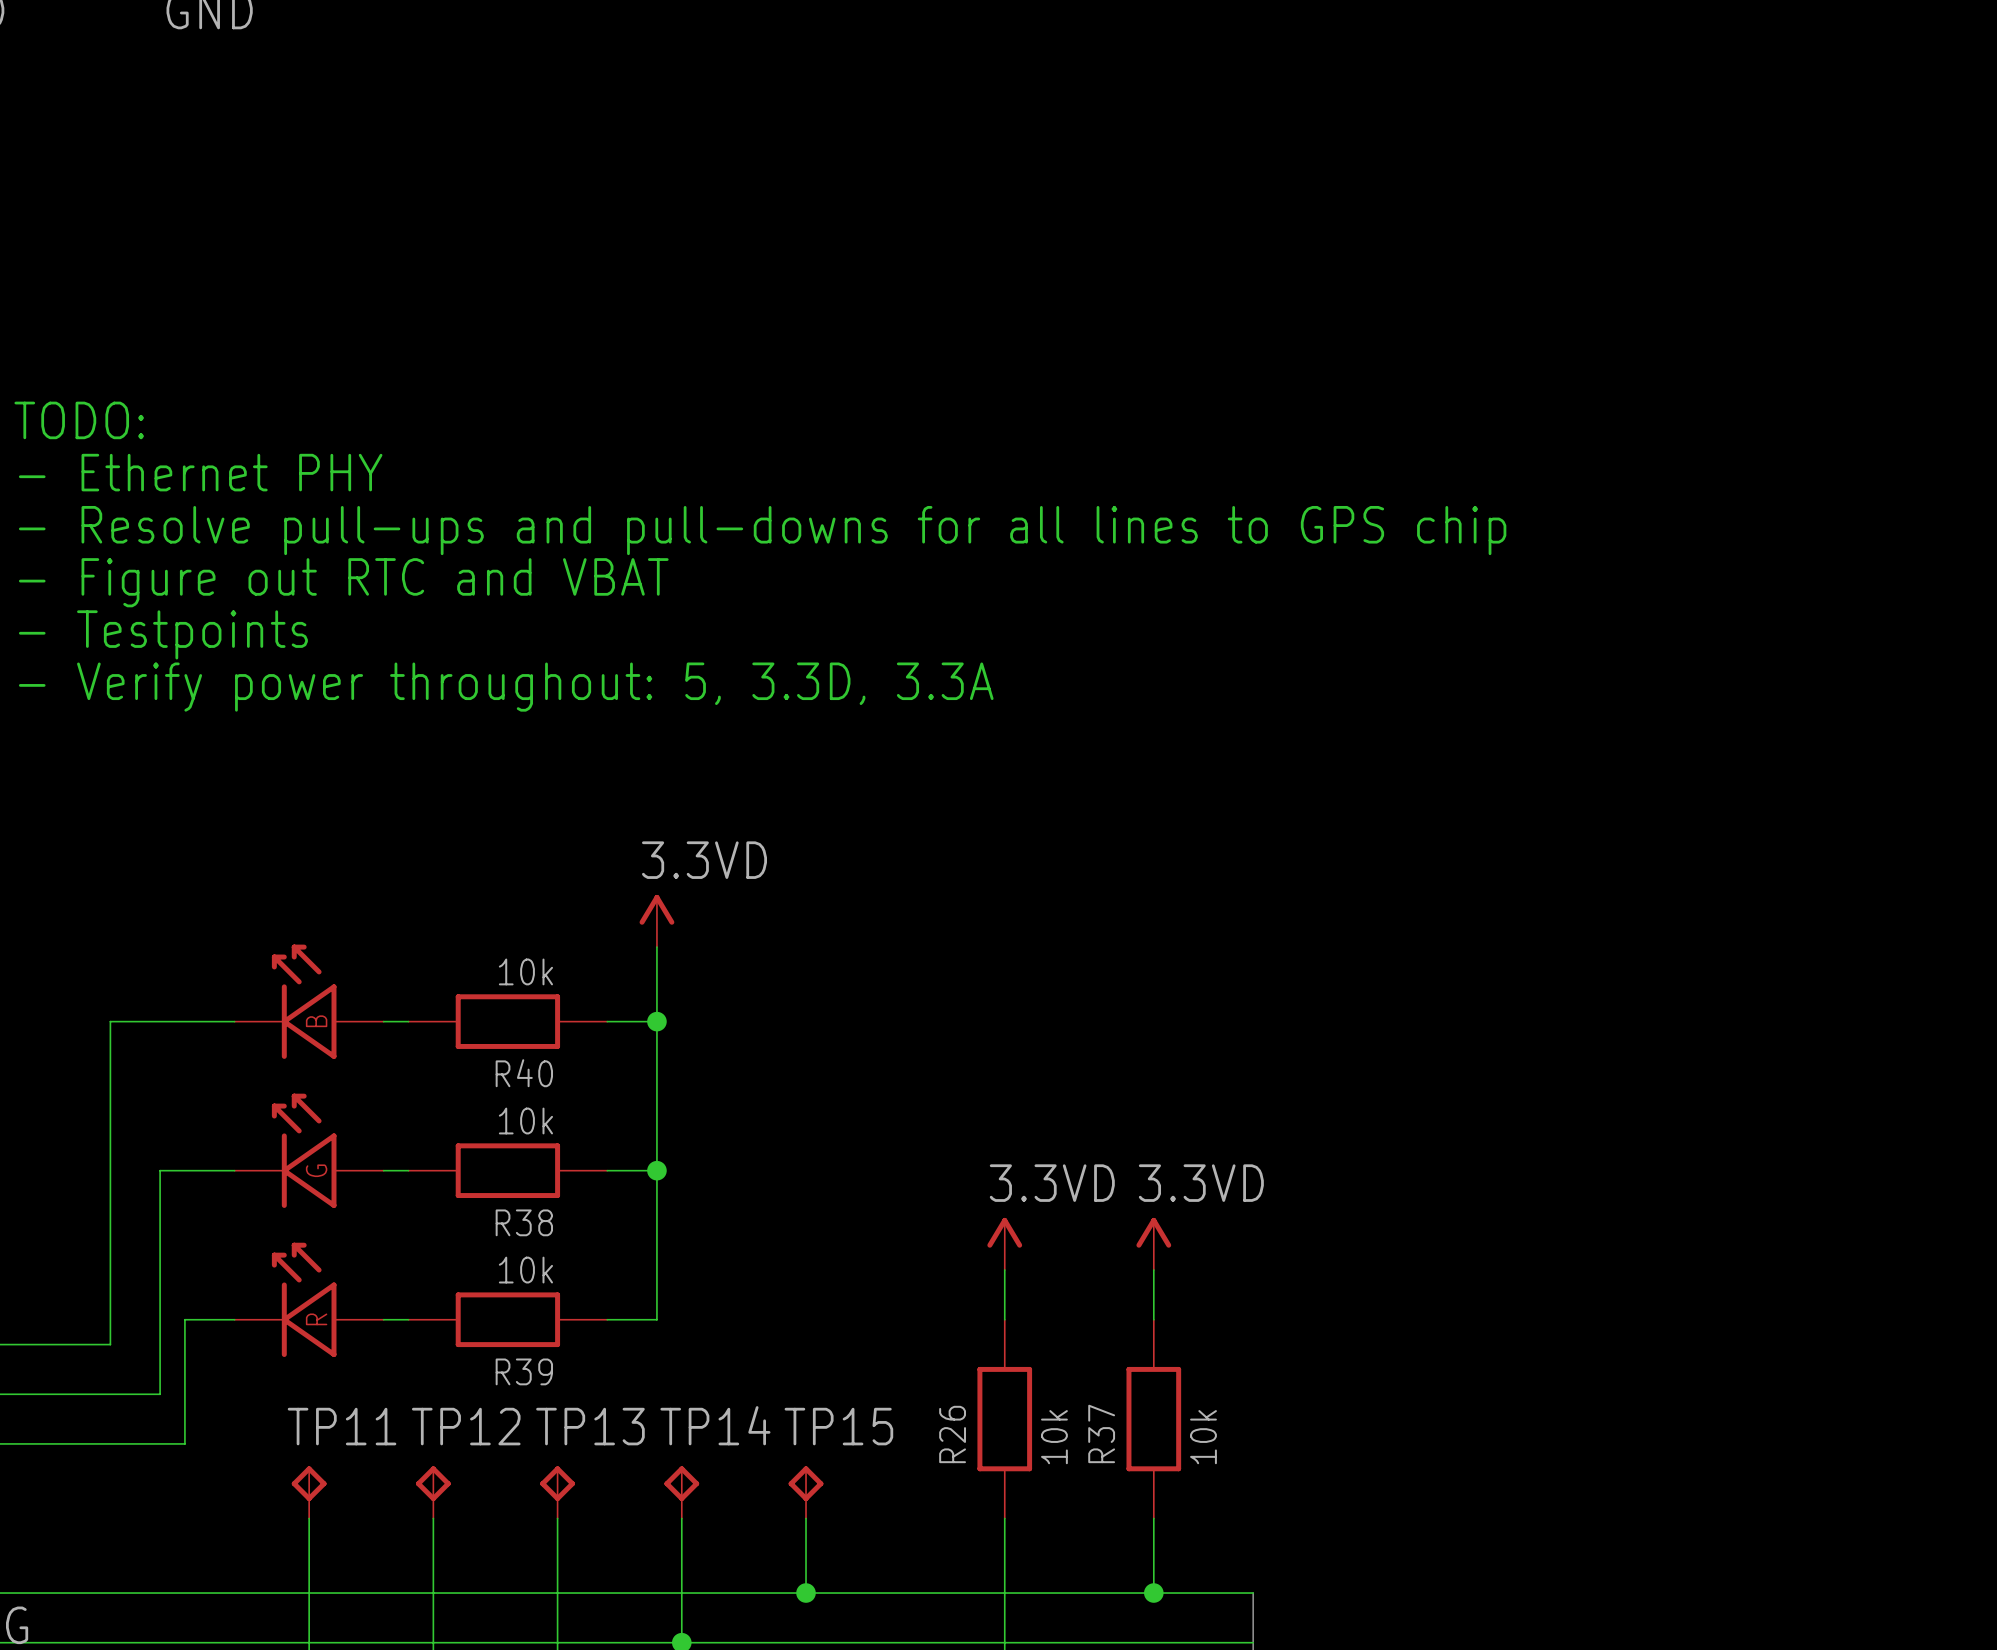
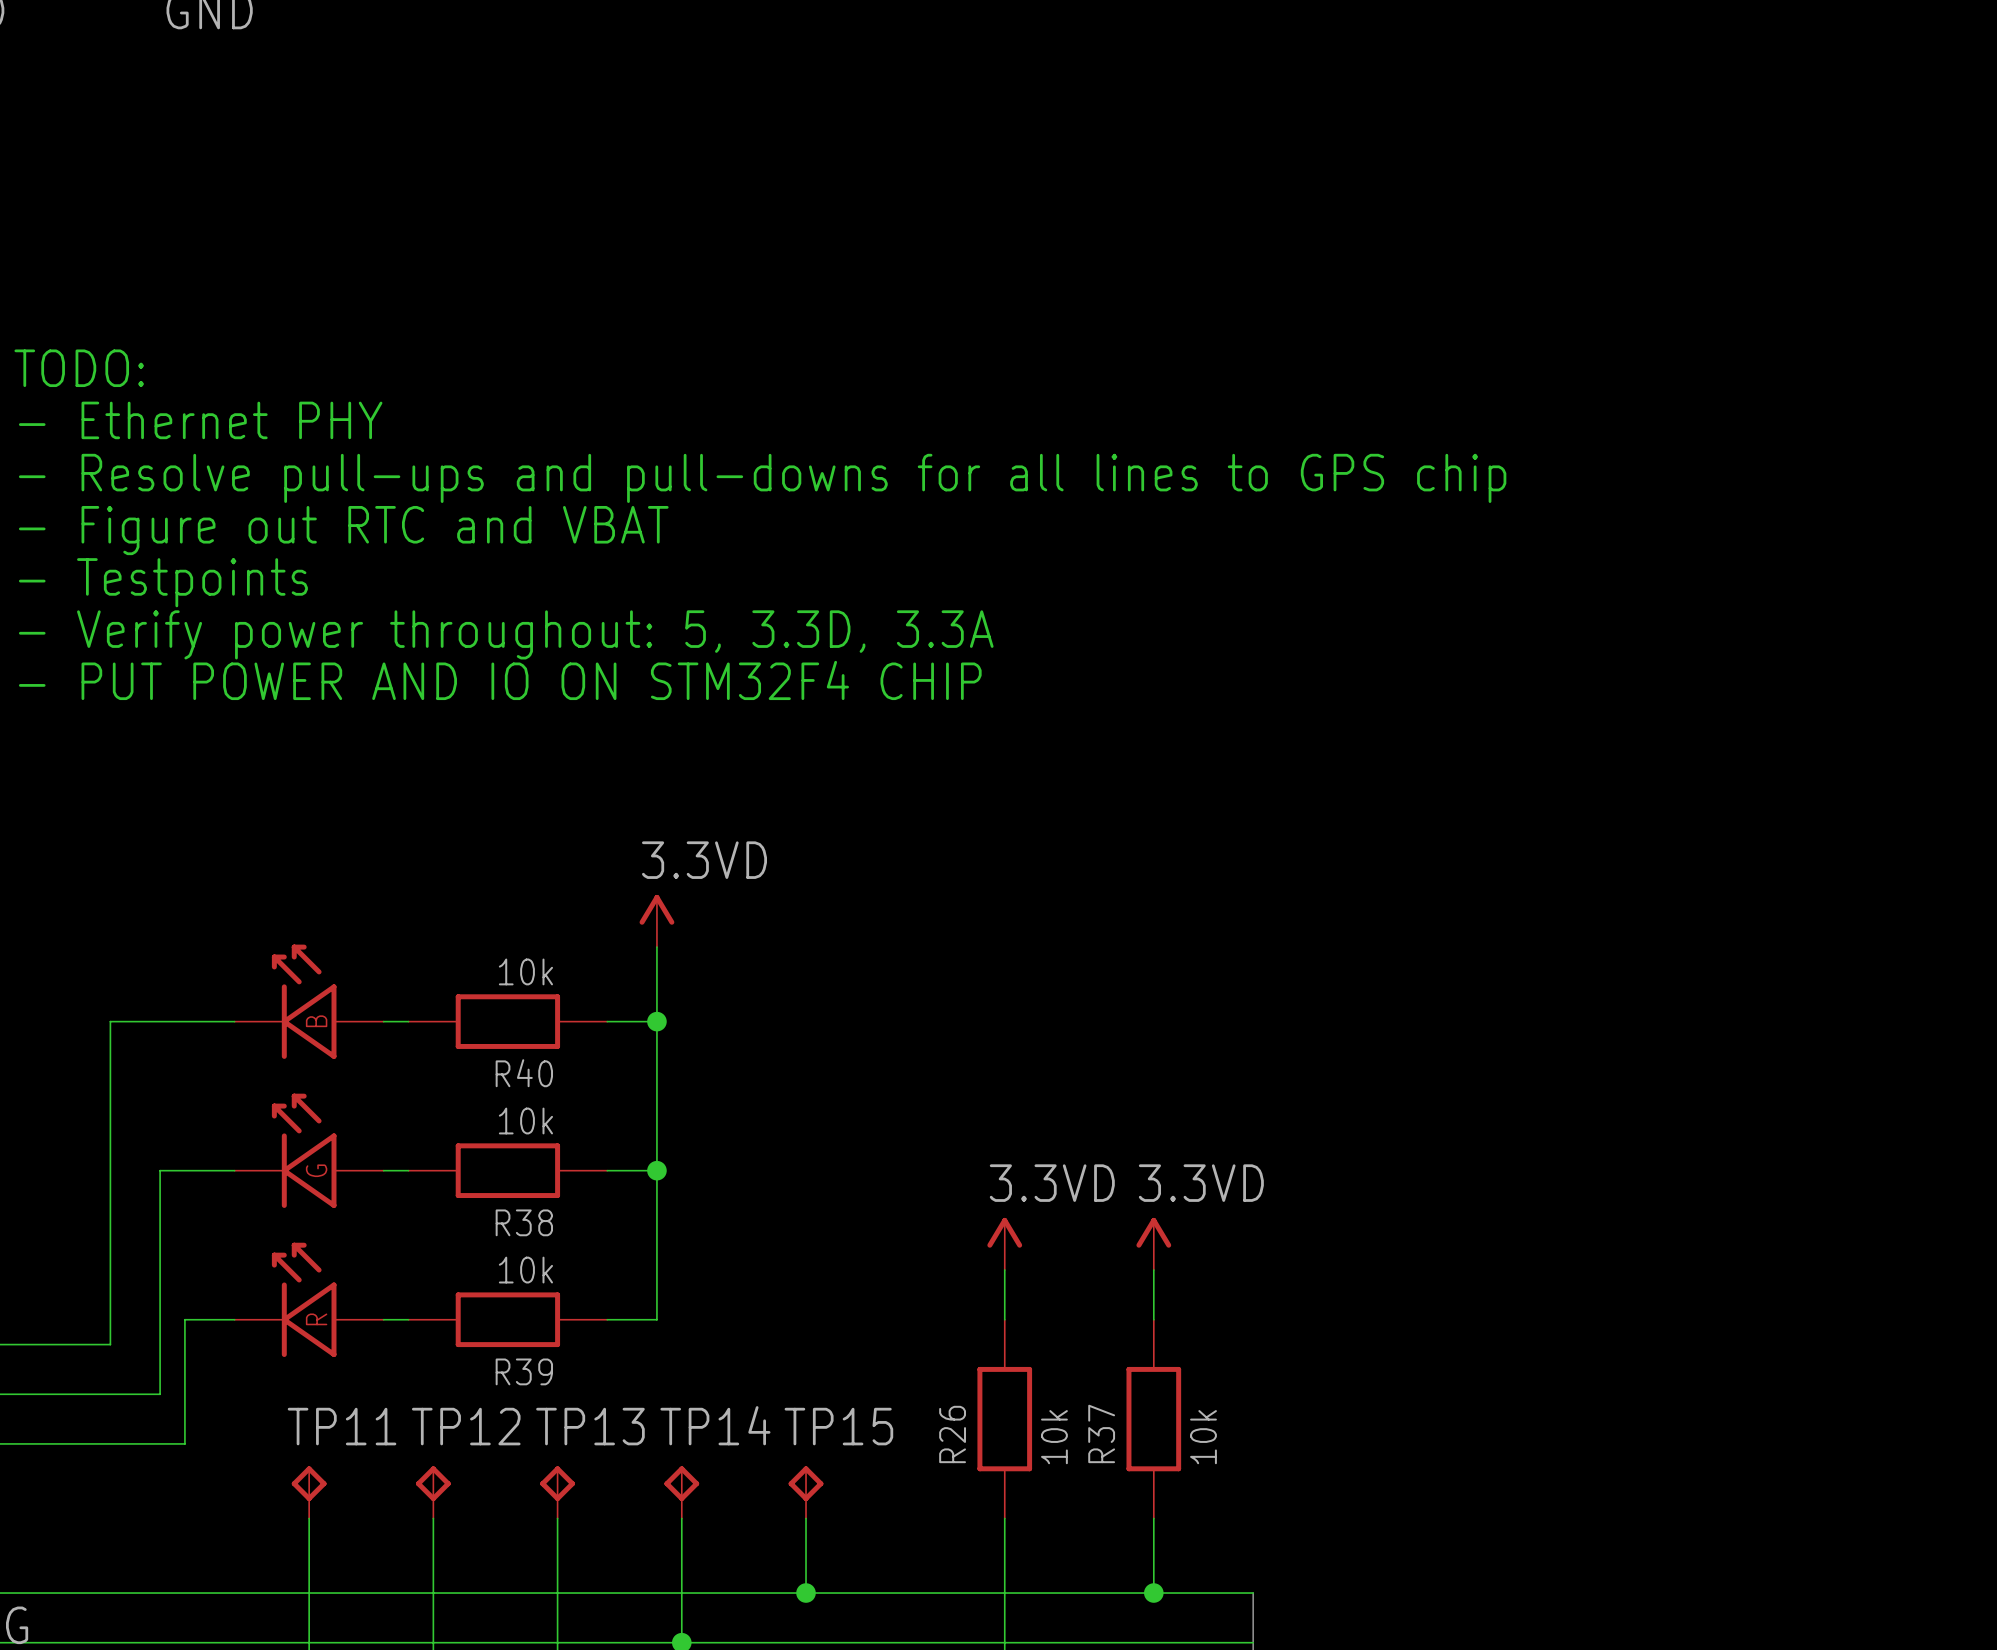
text: none -> TODO: (79, 368)
text: TODO: (79, 420) -> - Ethernet PHY (200, 420)
text: - Ethernet PHY (200, 472) -> - Resolve pull-ups and pull-downs for all lines to GPS chip (762, 478)
text: - Resolve pull-ups and pull-downs for all lines to GPS chip (762, 530) -> - Figure out RTC and VBAT (343, 530)
text: - Figure out RTC and VBAT (343, 582) -> - Testpoints (163, 582)
text: - Testpoints (163, 634) -> - Verify power throughout: 5, 3.3D, 3.3A (506, 634)
text: - Verify power throughout: 5, 3.3D, 3.3A (506, 687) -> - PUT POWER AND IO ON STM32F4 CHIP (500, 680)

